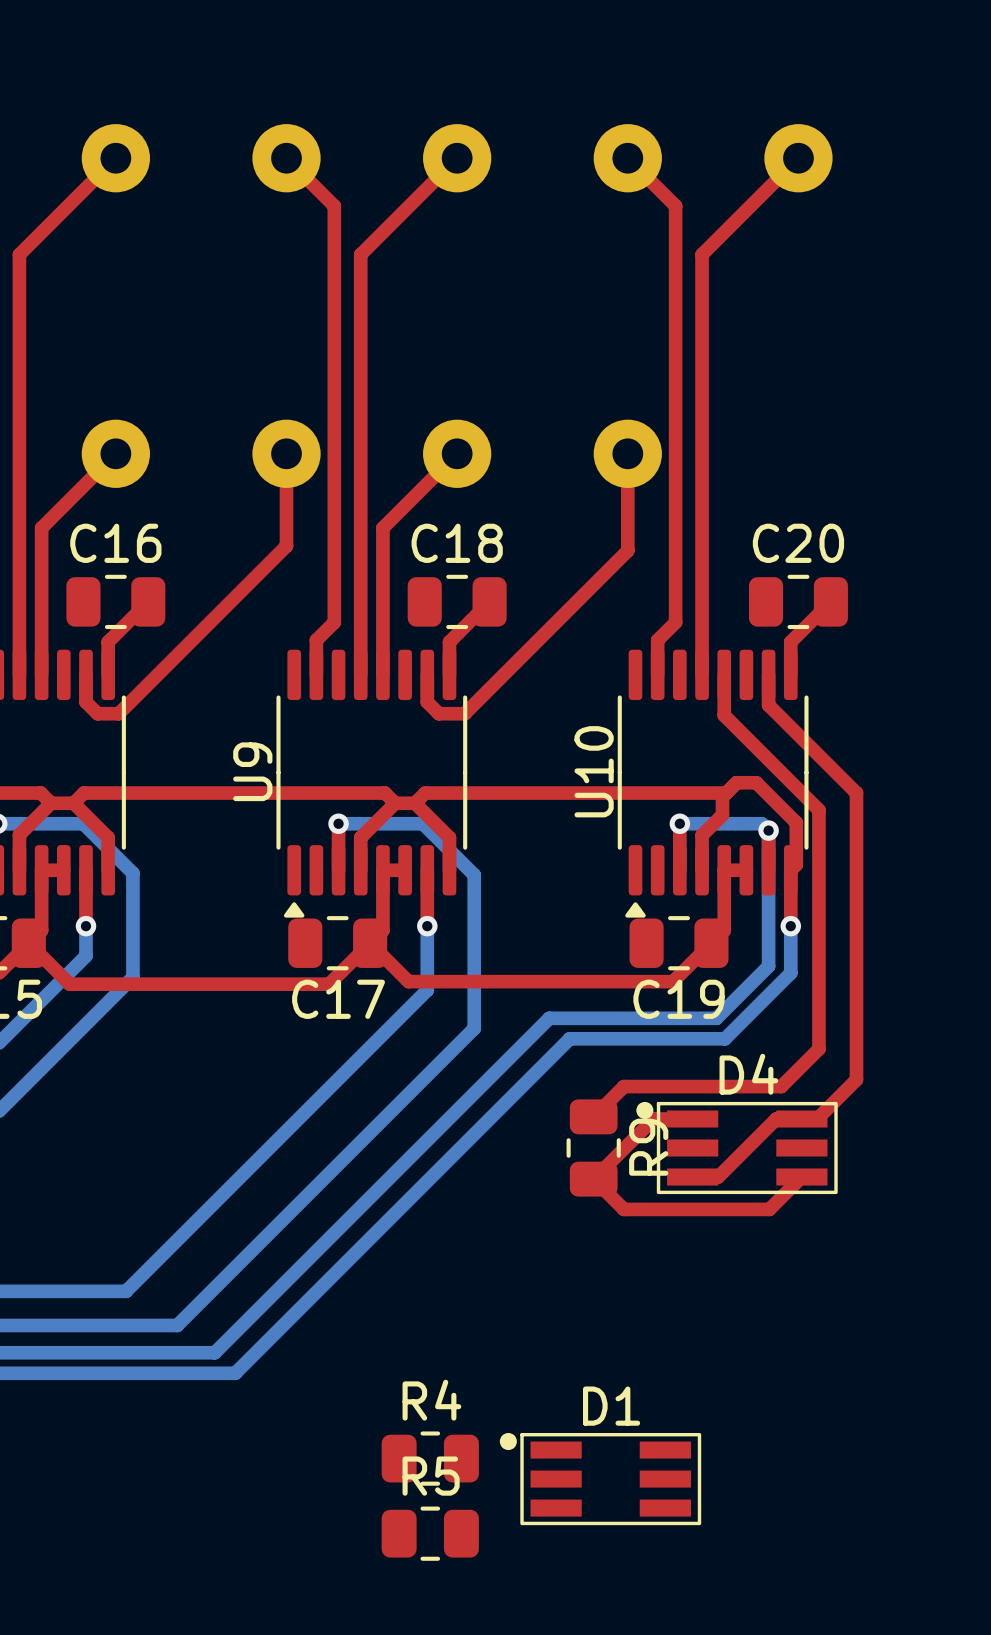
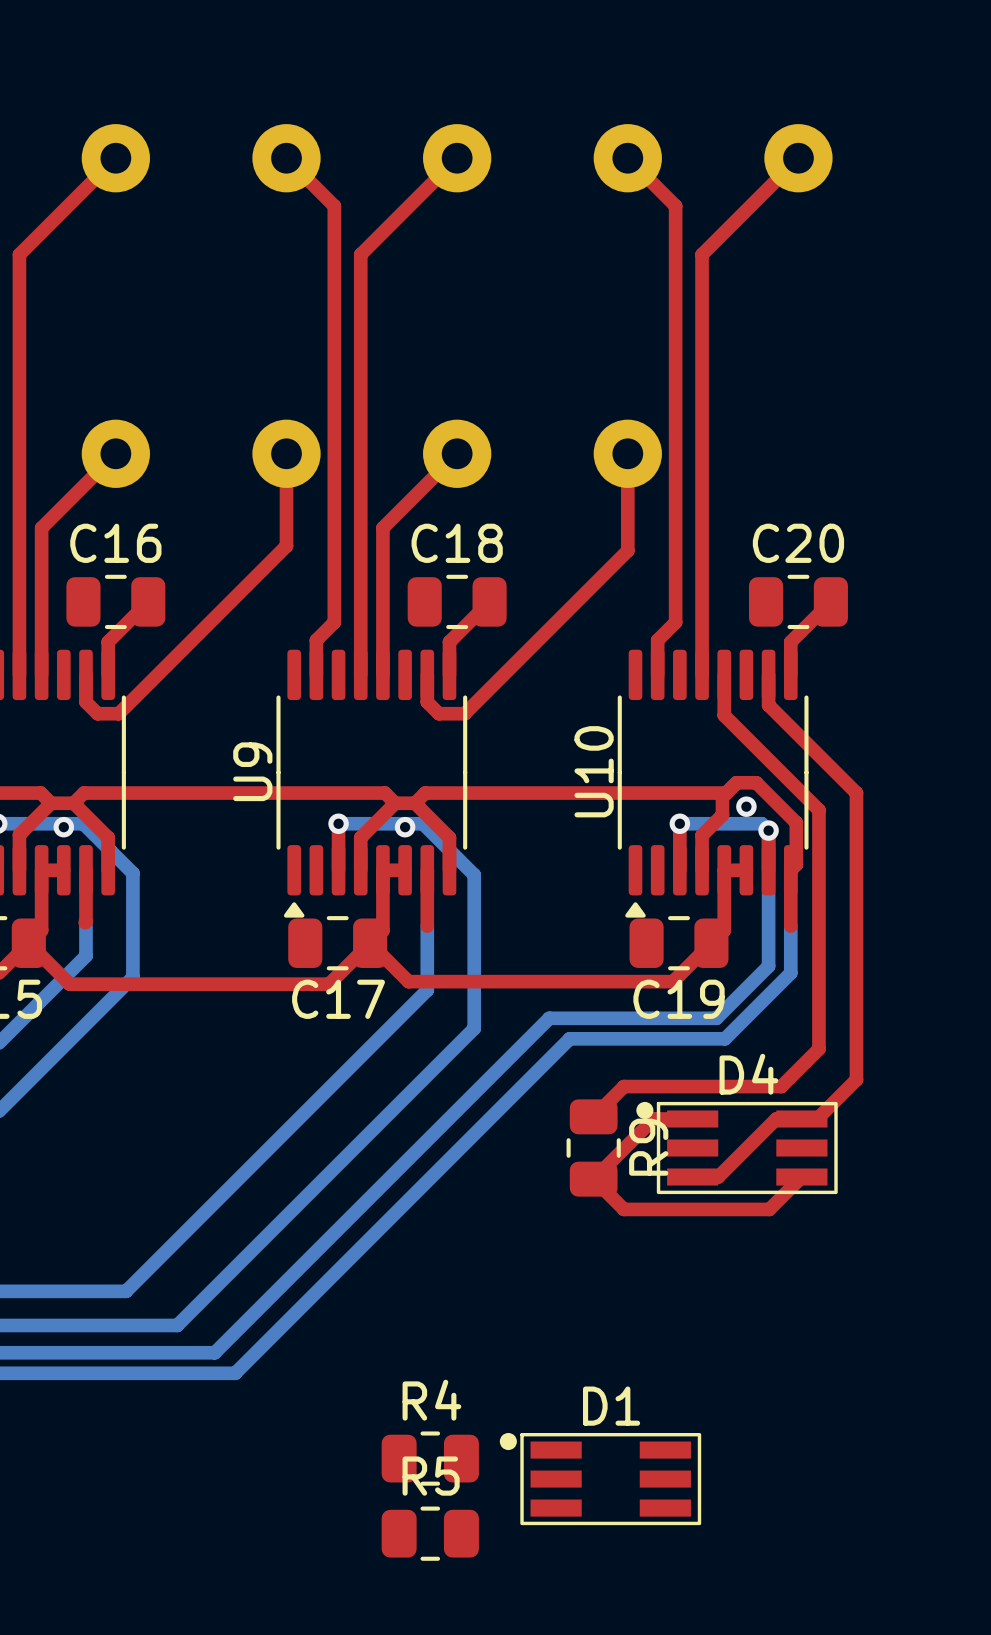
via position: (85, 926) -> (63, 827)
via position: (427, 926) -> (405, 827)
via position: (790, 926) -> (746, 806)

